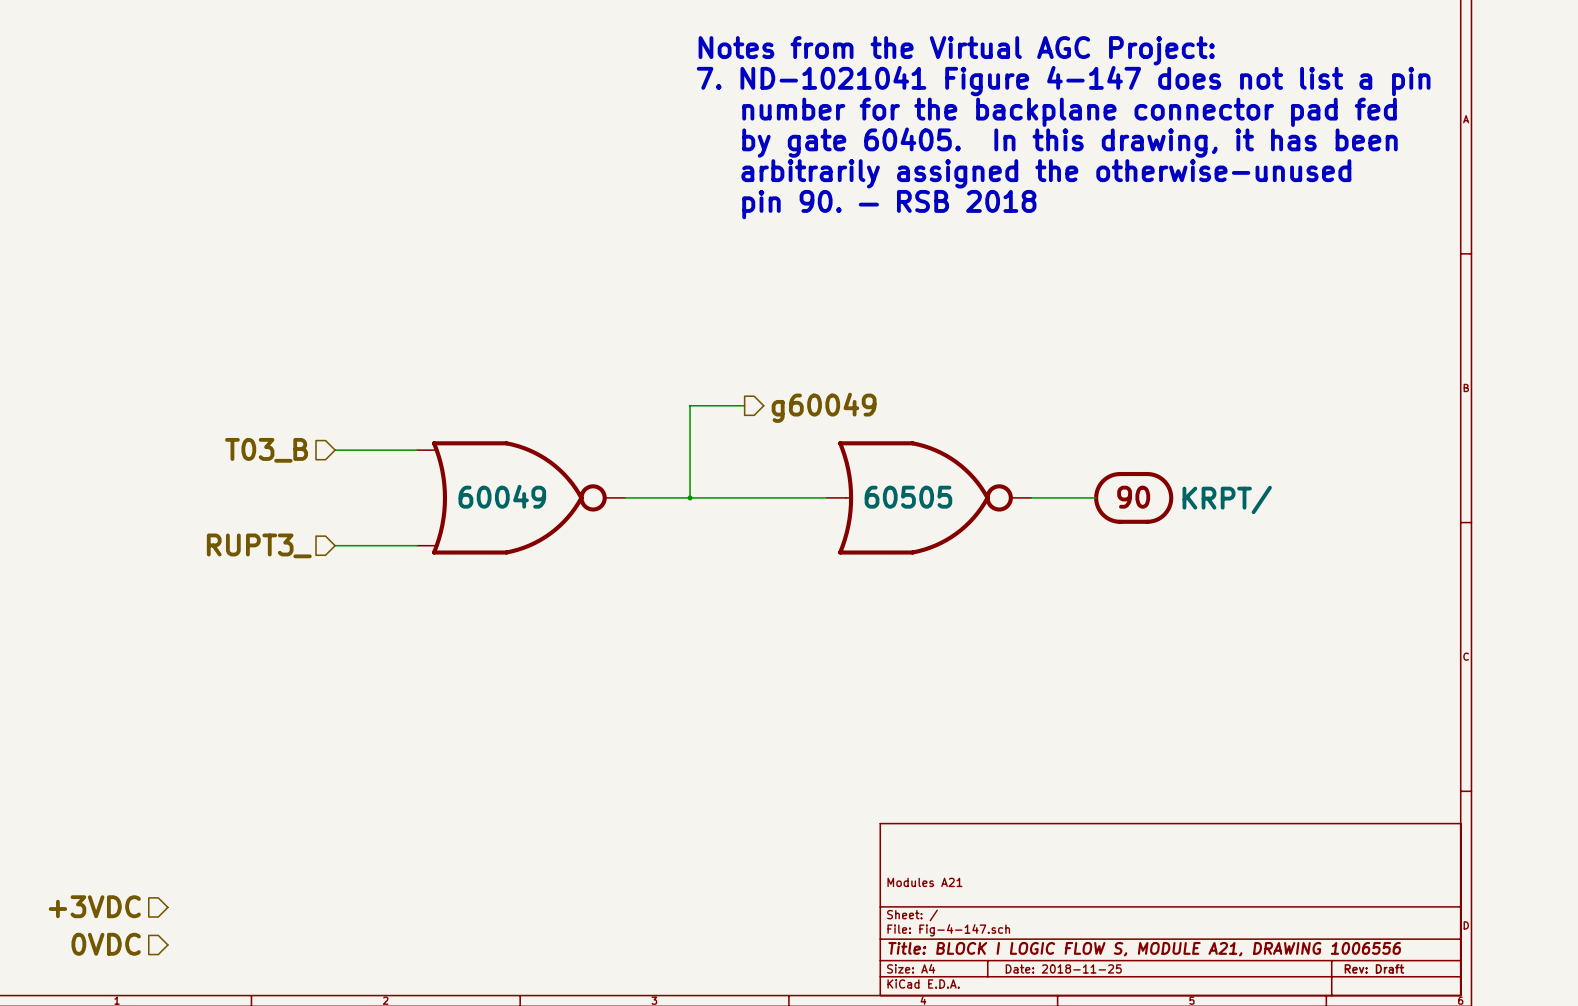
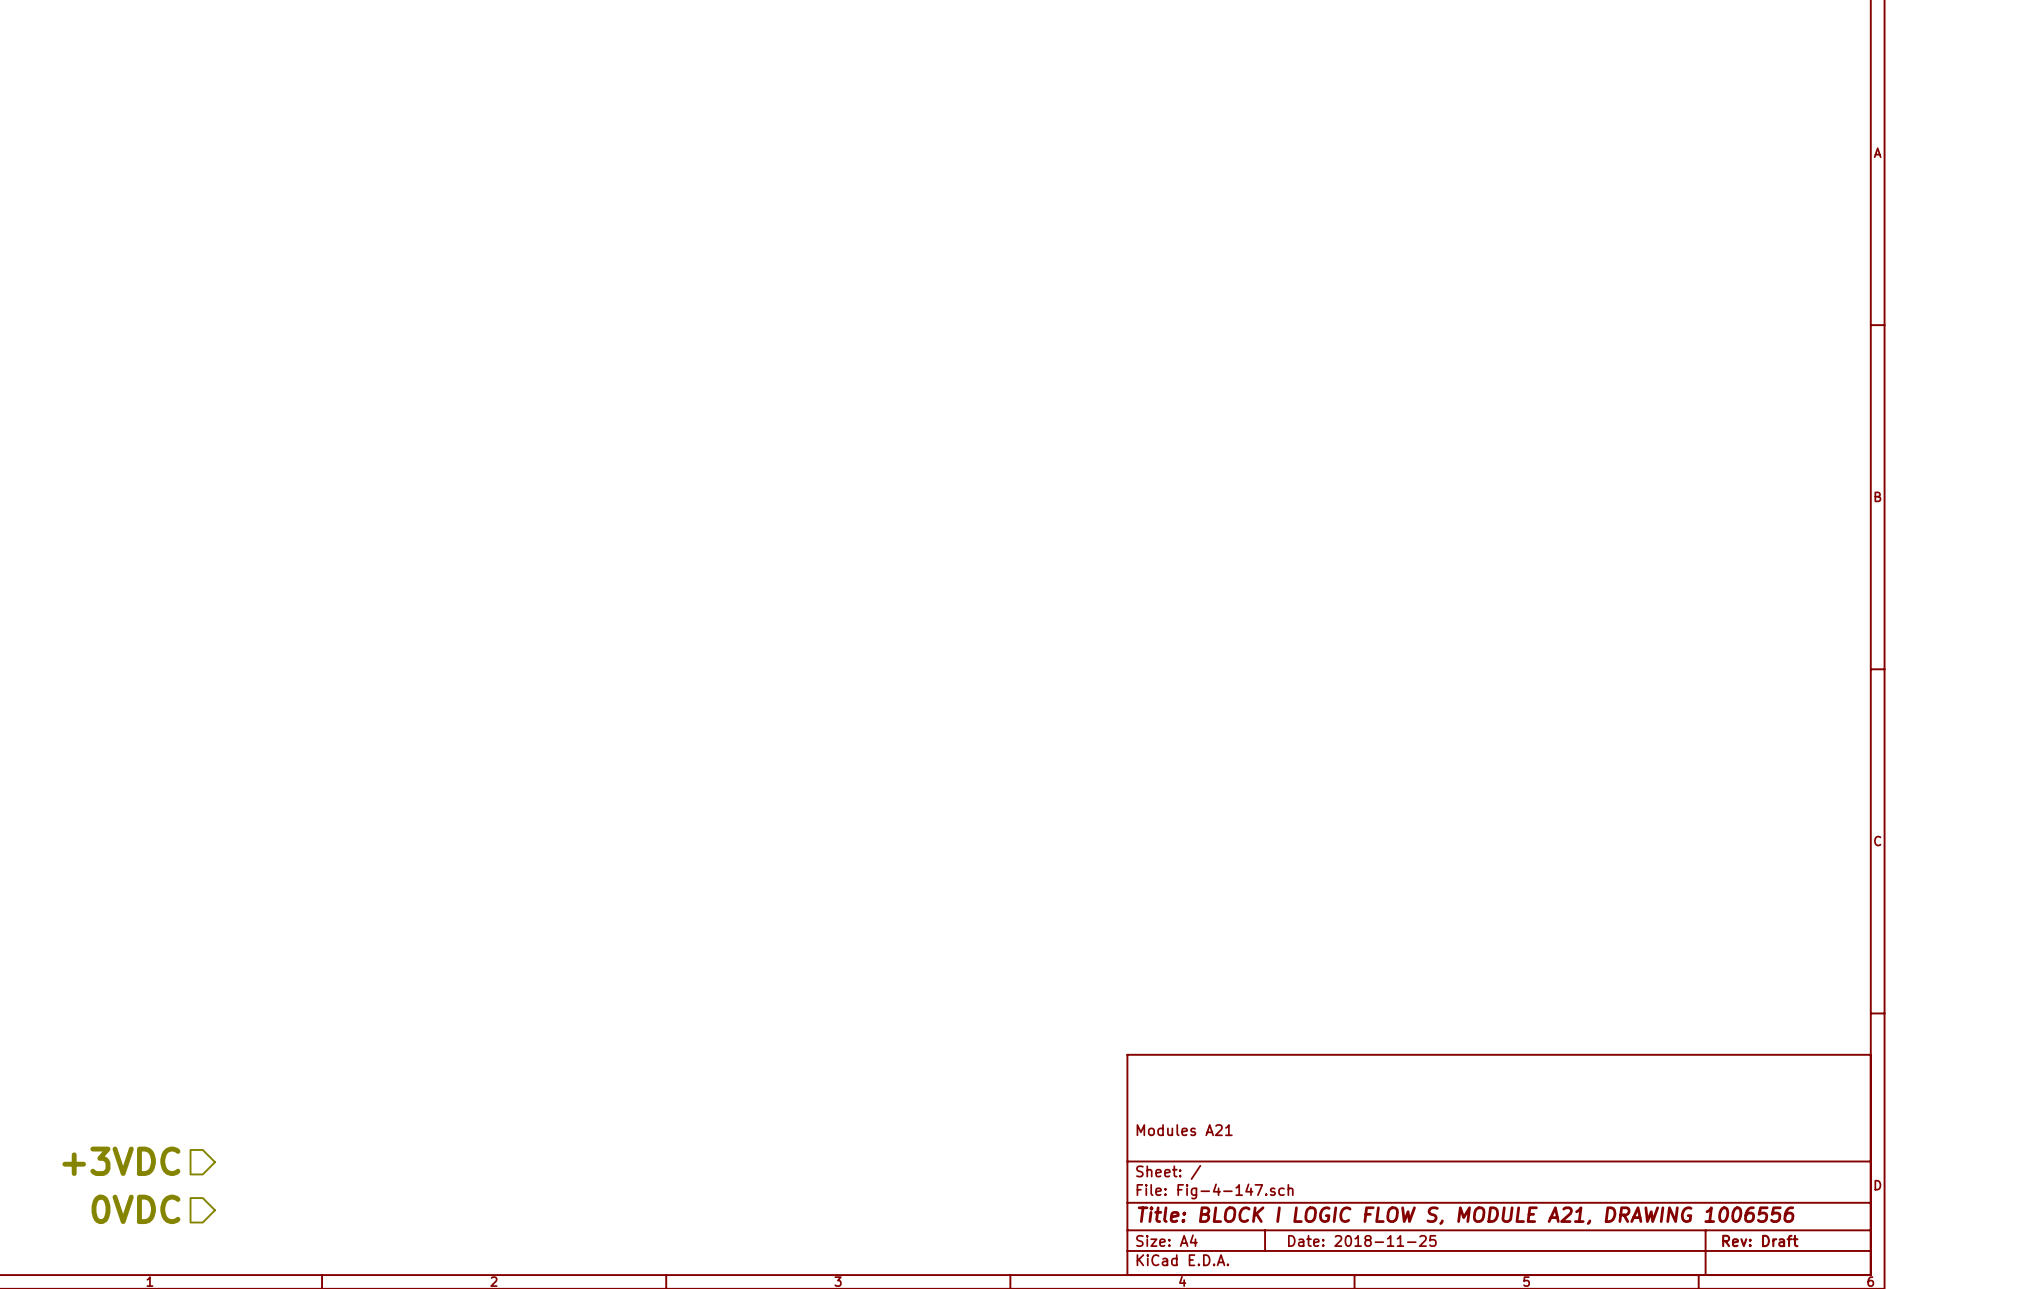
text: Notes from the Virtual AGC Project: (956, 50) -> none
text: 7. ND-1021041 Figure 4-147 does not list a pin (1063, 81) -> none
text: number for the backplane connector pad fed (1069, 112) -> none
text: by gate 60405. In this drawing, it has been (1070, 142) -> none
text: arbitrarily assigned the otherwise-unused (1046, 173) -> none
text: pin 90. — RSB 2018 (889, 204) -> none
wire: (744, 405) (690, 405) (690, 497) -> none
hierarchical label: g60049 (824, 407) -> none
hierarchical label: T03_B (266, 450) -> none
wire: (335, 450) (417, 450) -> none
part: (521, 497) -> none
wire: (625, 497) (826, 497) -> none
junction: (690, 497) -> none
part: (928, 497) -> none
wire: (1031, 497) (1096, 497) -> none
part: (1133, 497) -> none
hierarchical label: RUPT3_ (259, 545) -> none
wire: (335, 545) (417, 545) -> none

